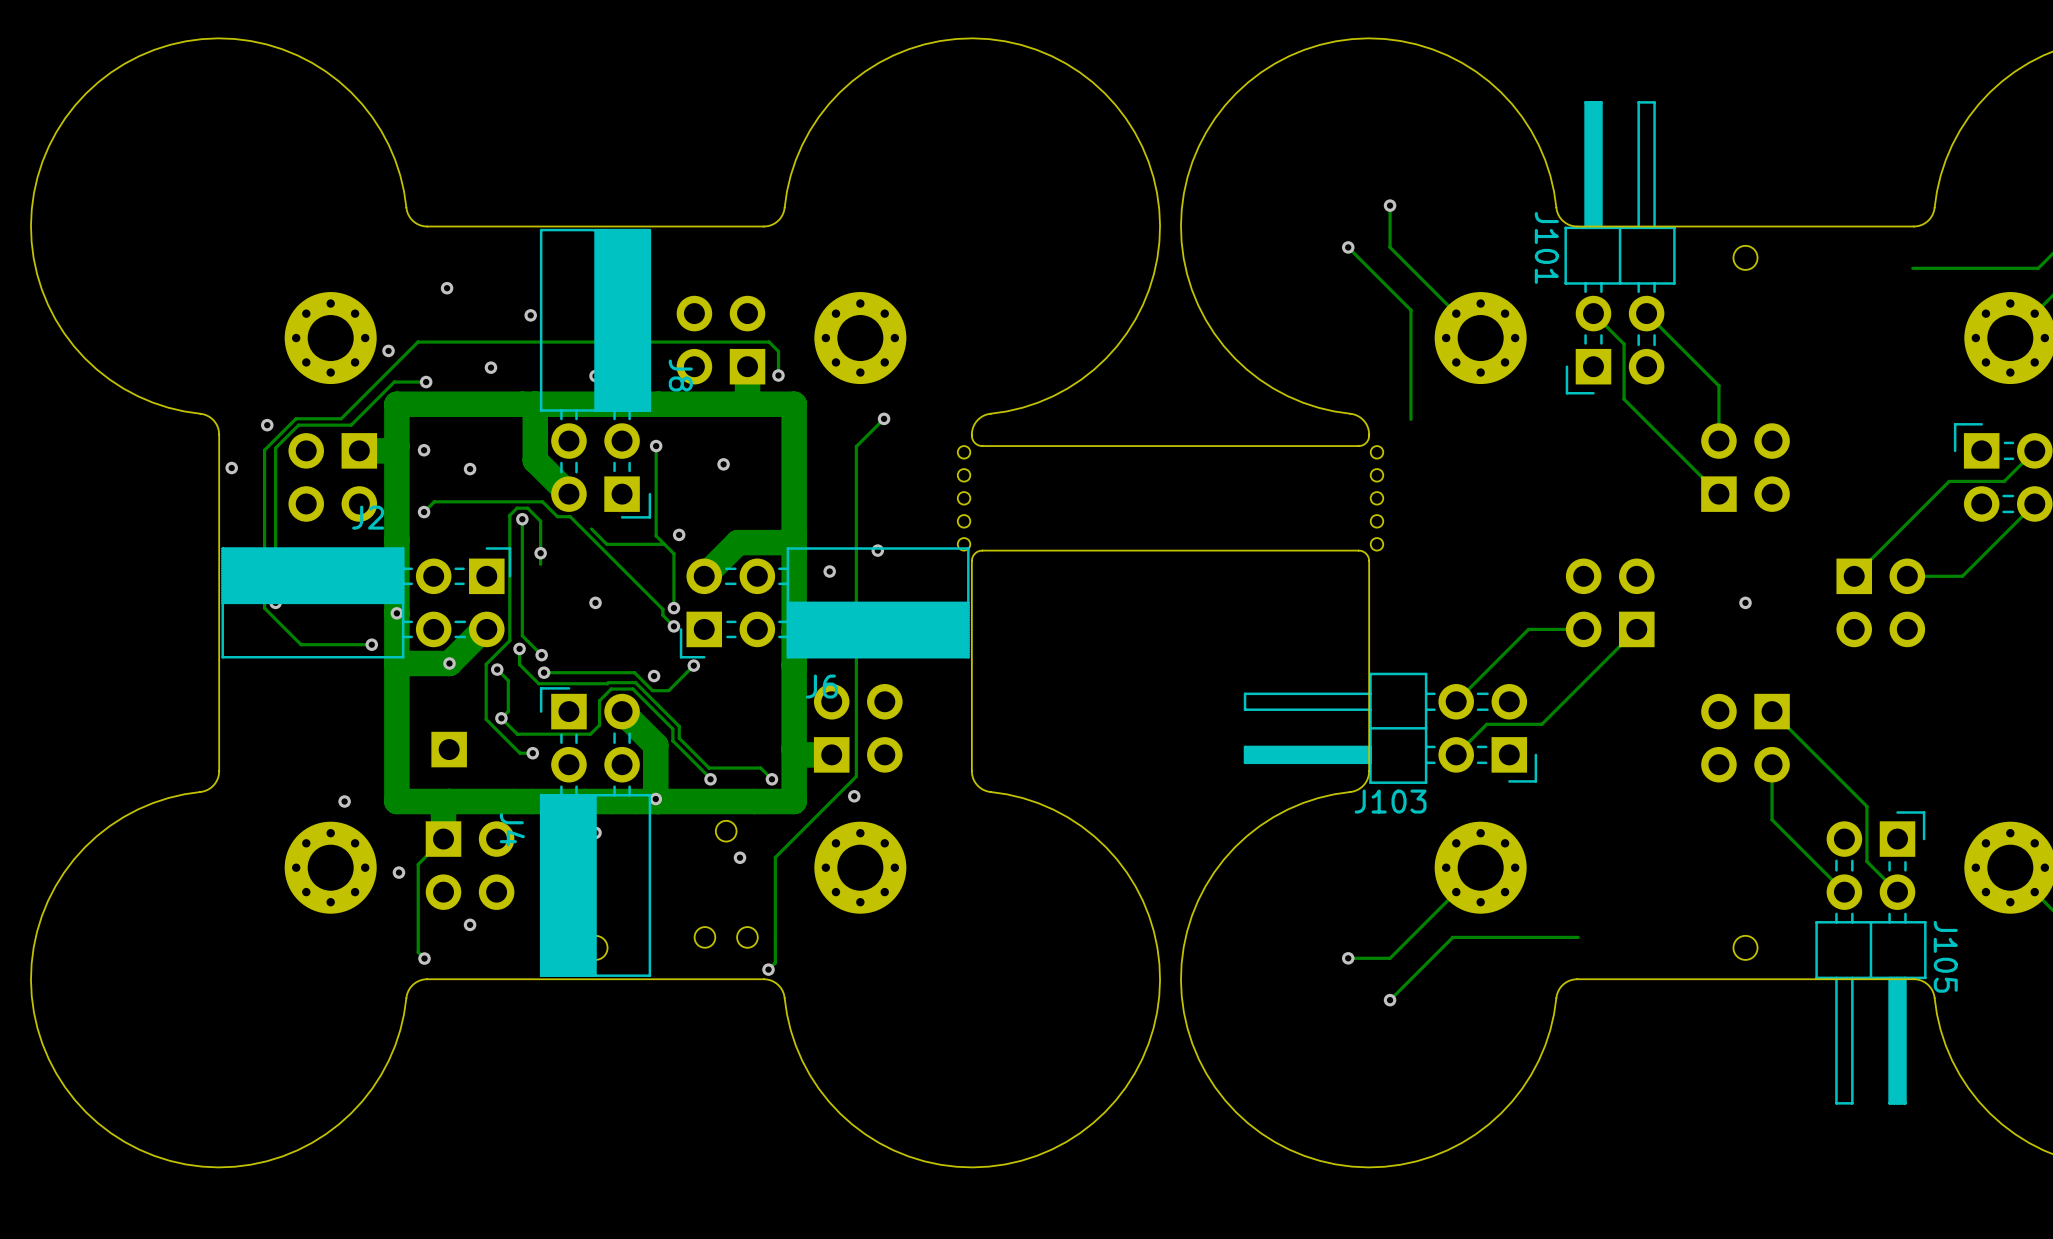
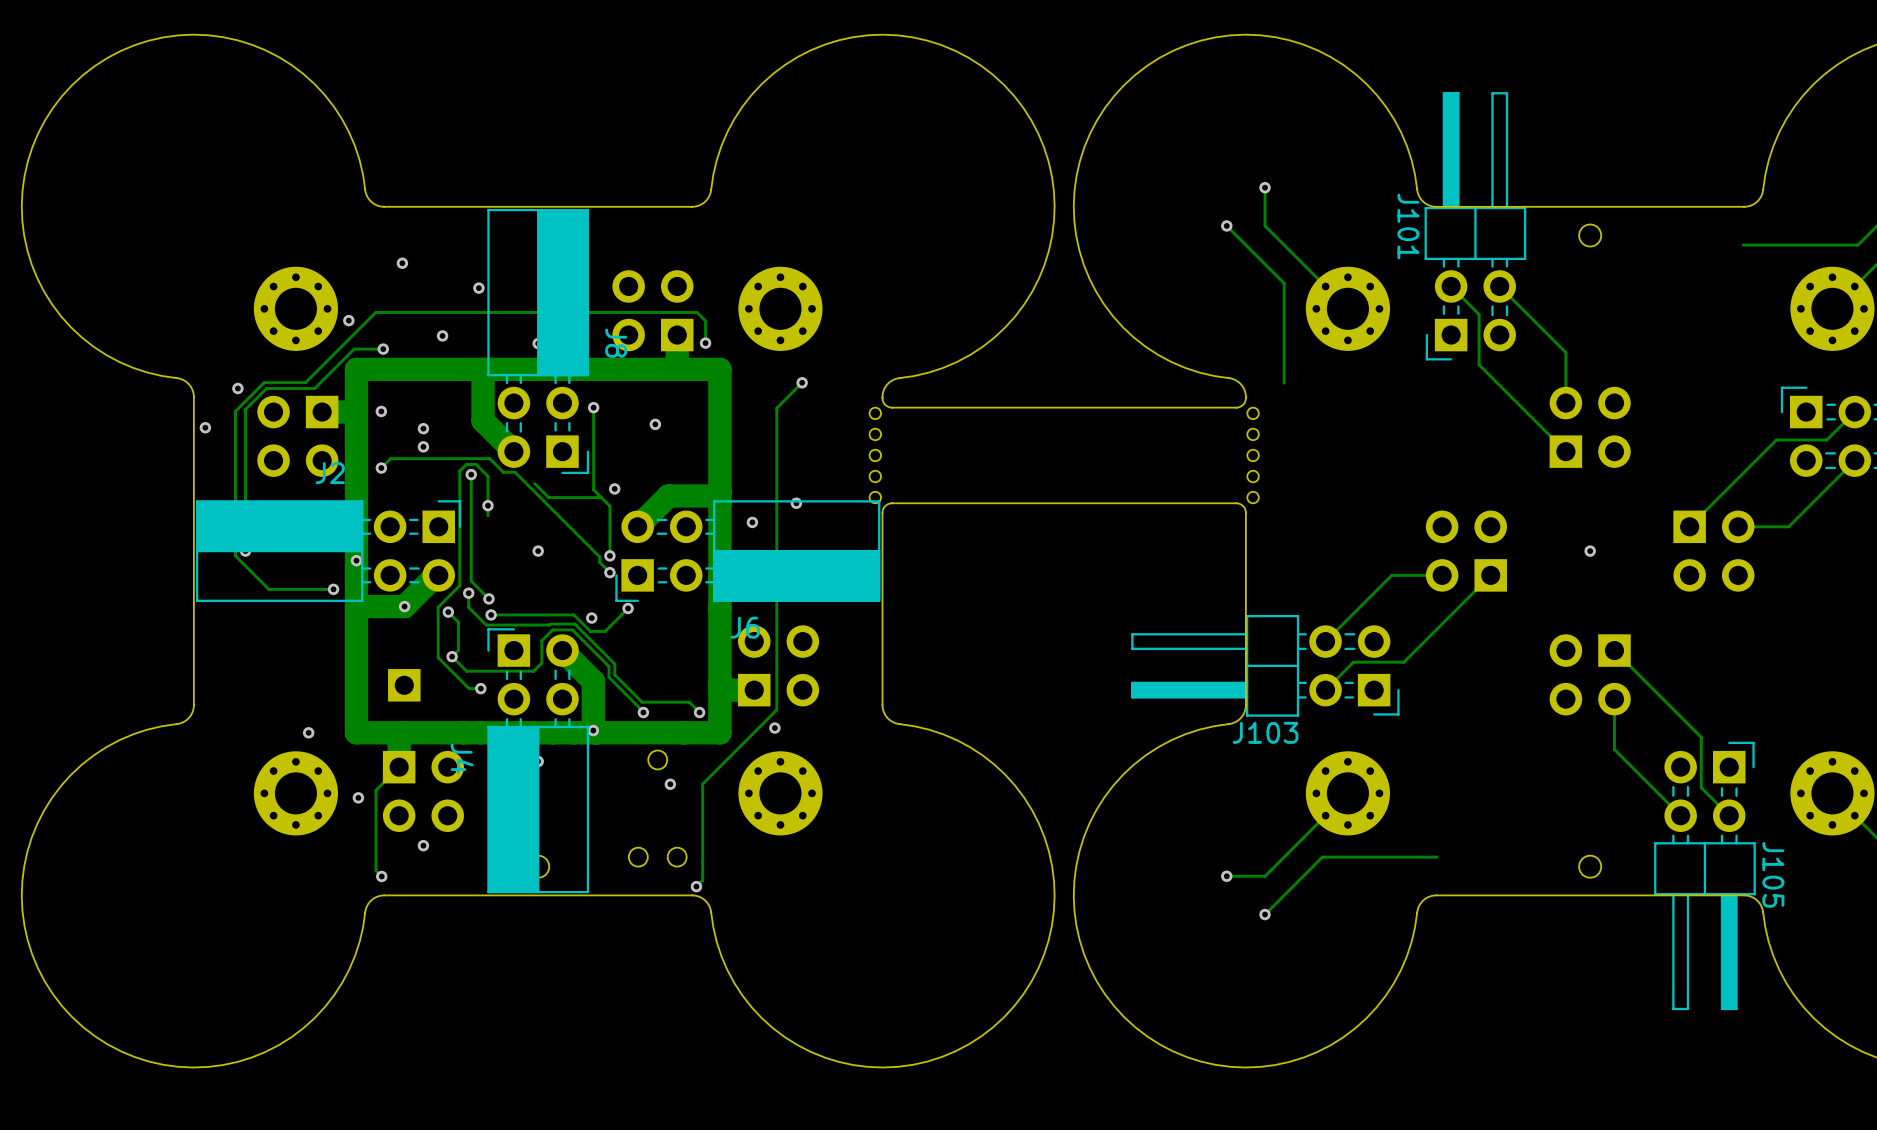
via: none -> (423, 446)

